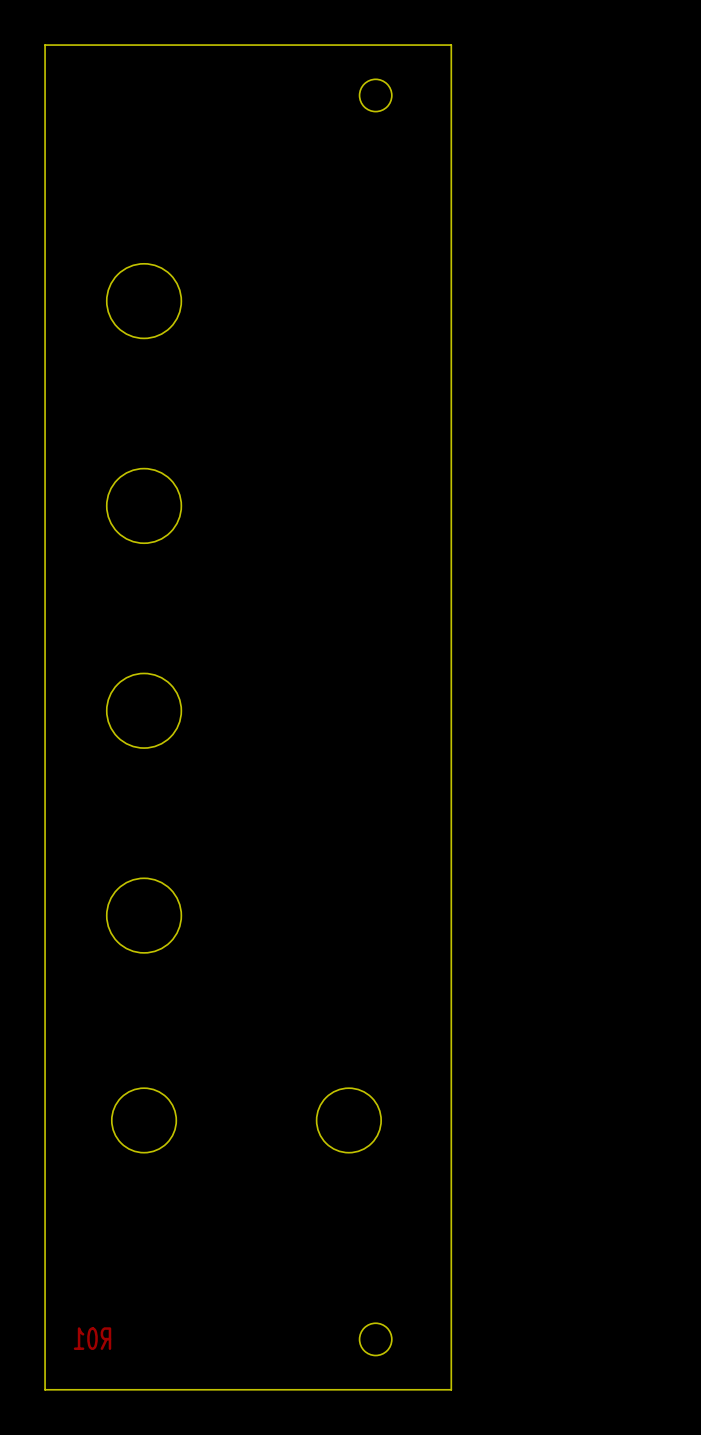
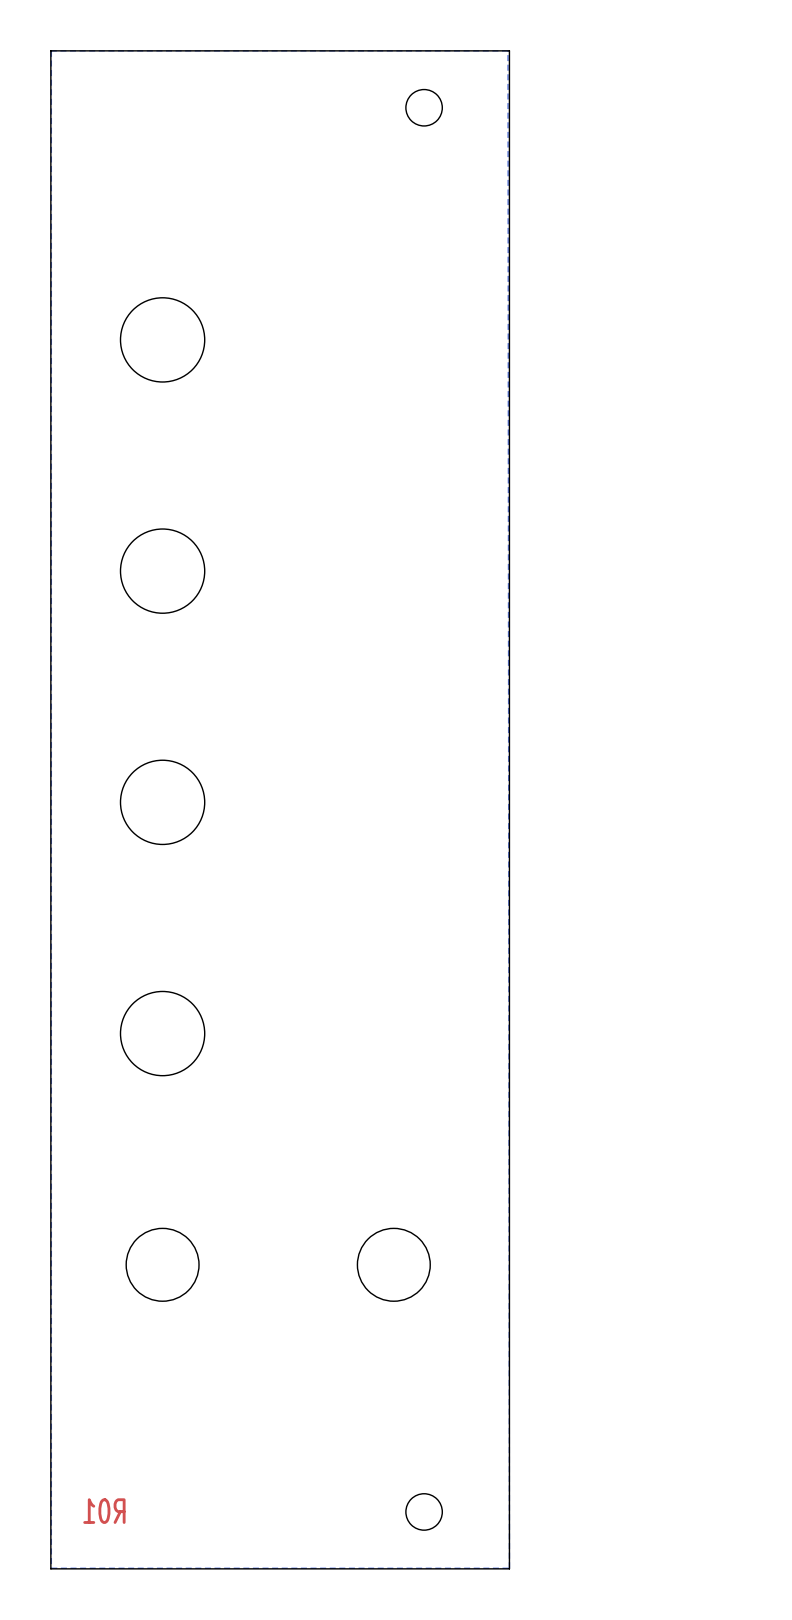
bottom zone outline: none -> (508, 50) (509, 1568) (51, 1568) (51, 50) (508, 50)

